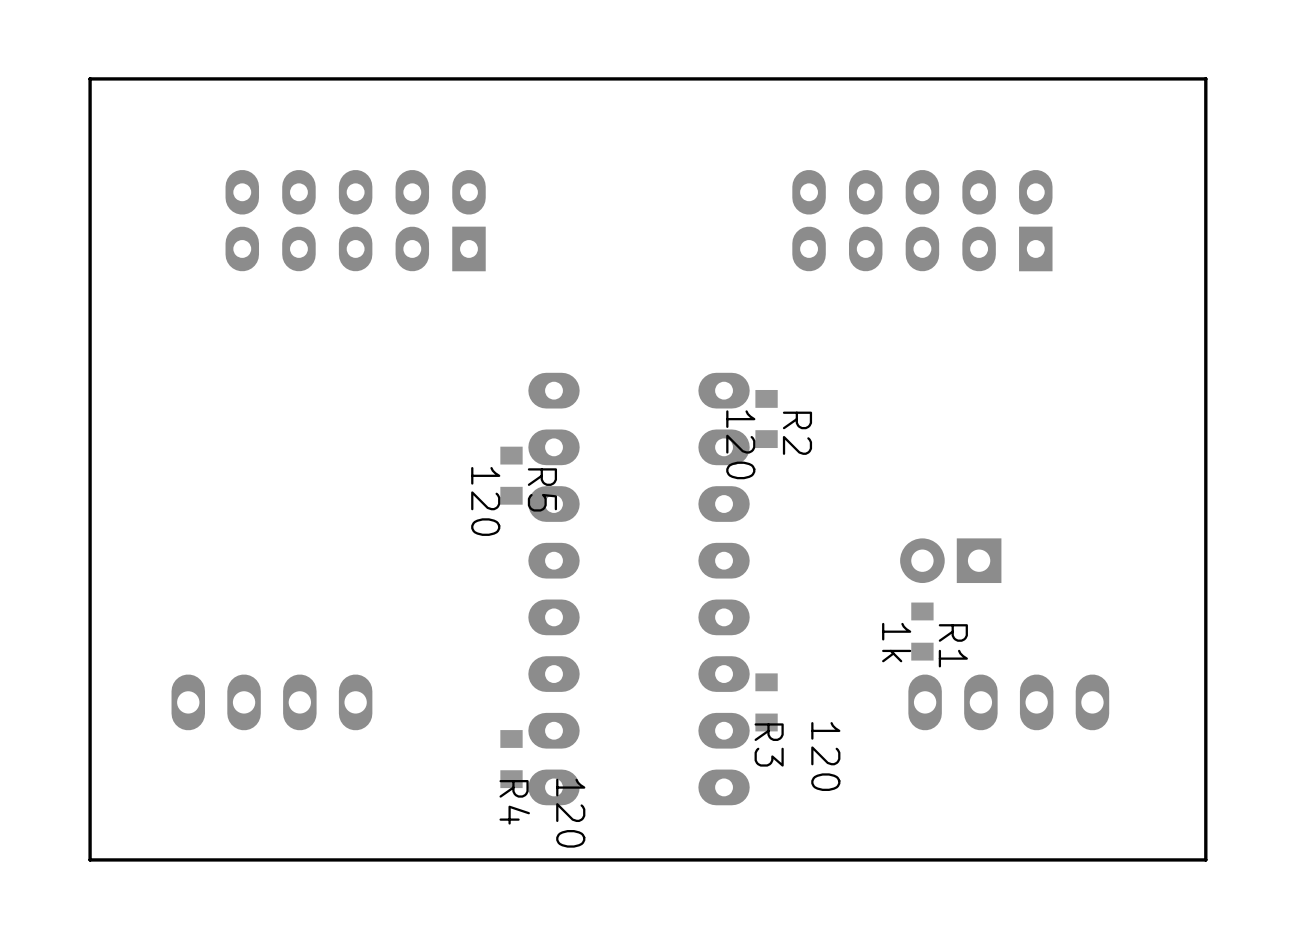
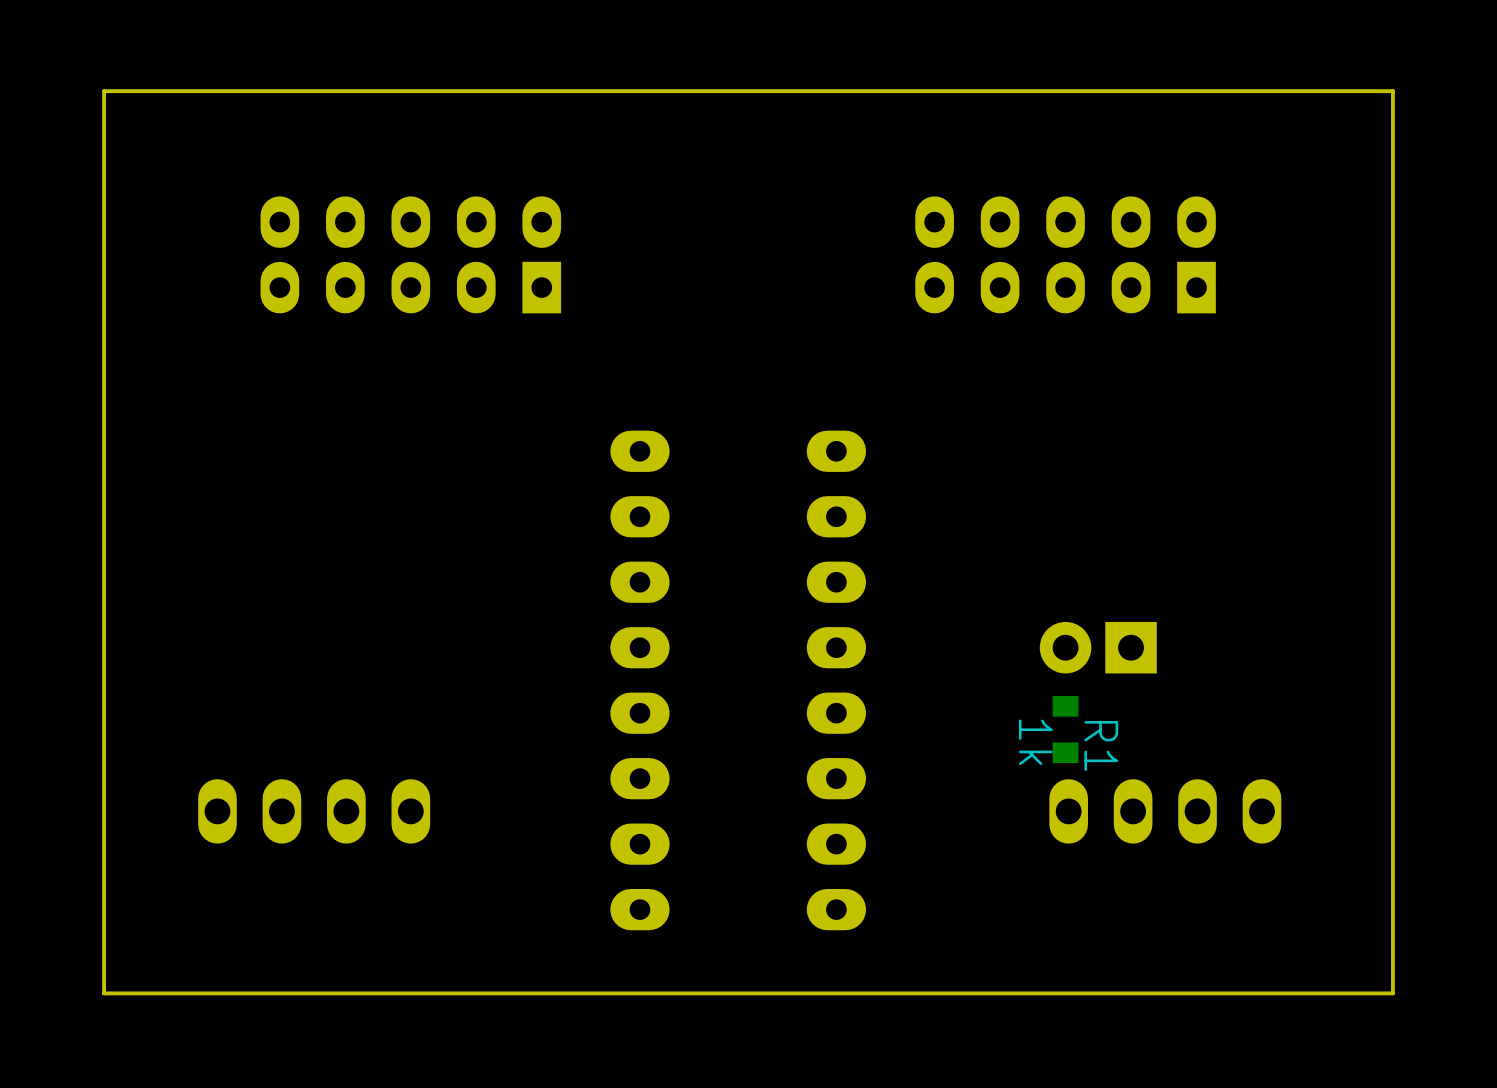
R2: 120 (766, 419) -> none
R5: 120 (511, 475) -> none
R3: 120 (766, 702) -> none
R4: 120 (511, 759) -> none

